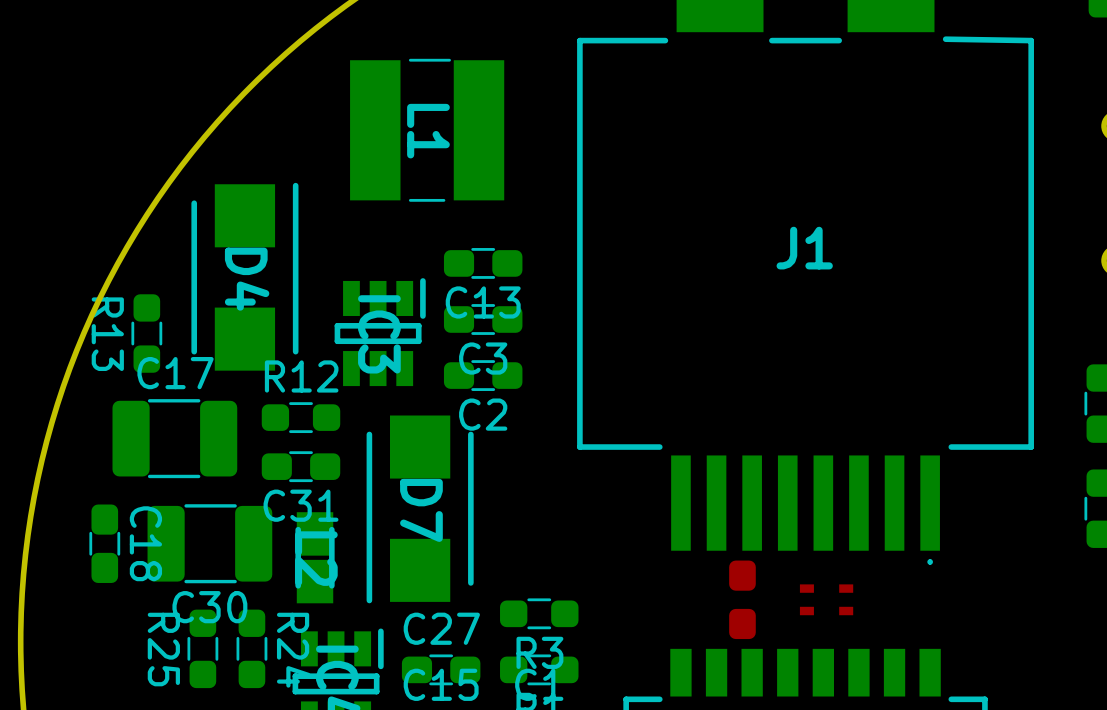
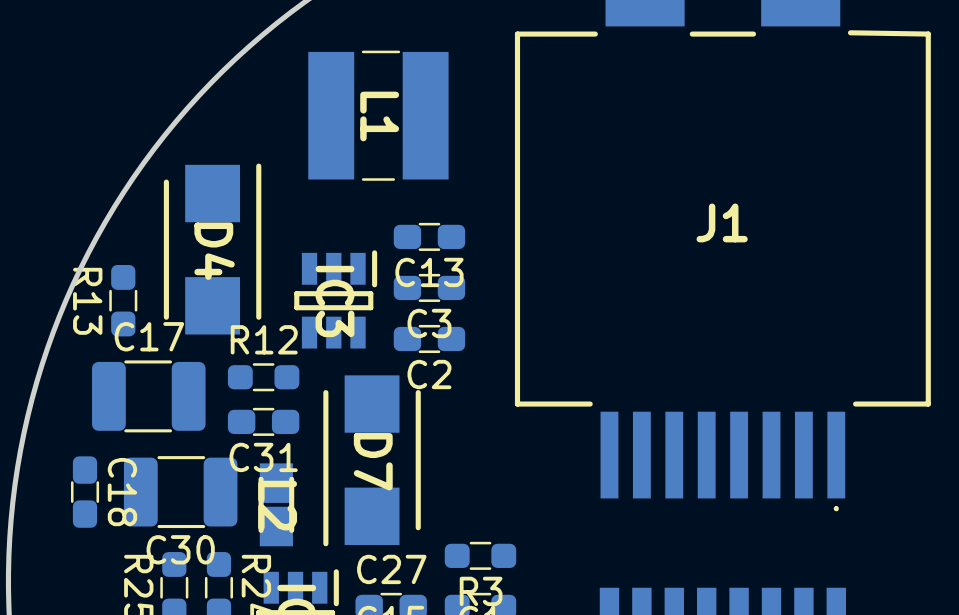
part: (742, 599) -> none
part: (826, 599) -> none

